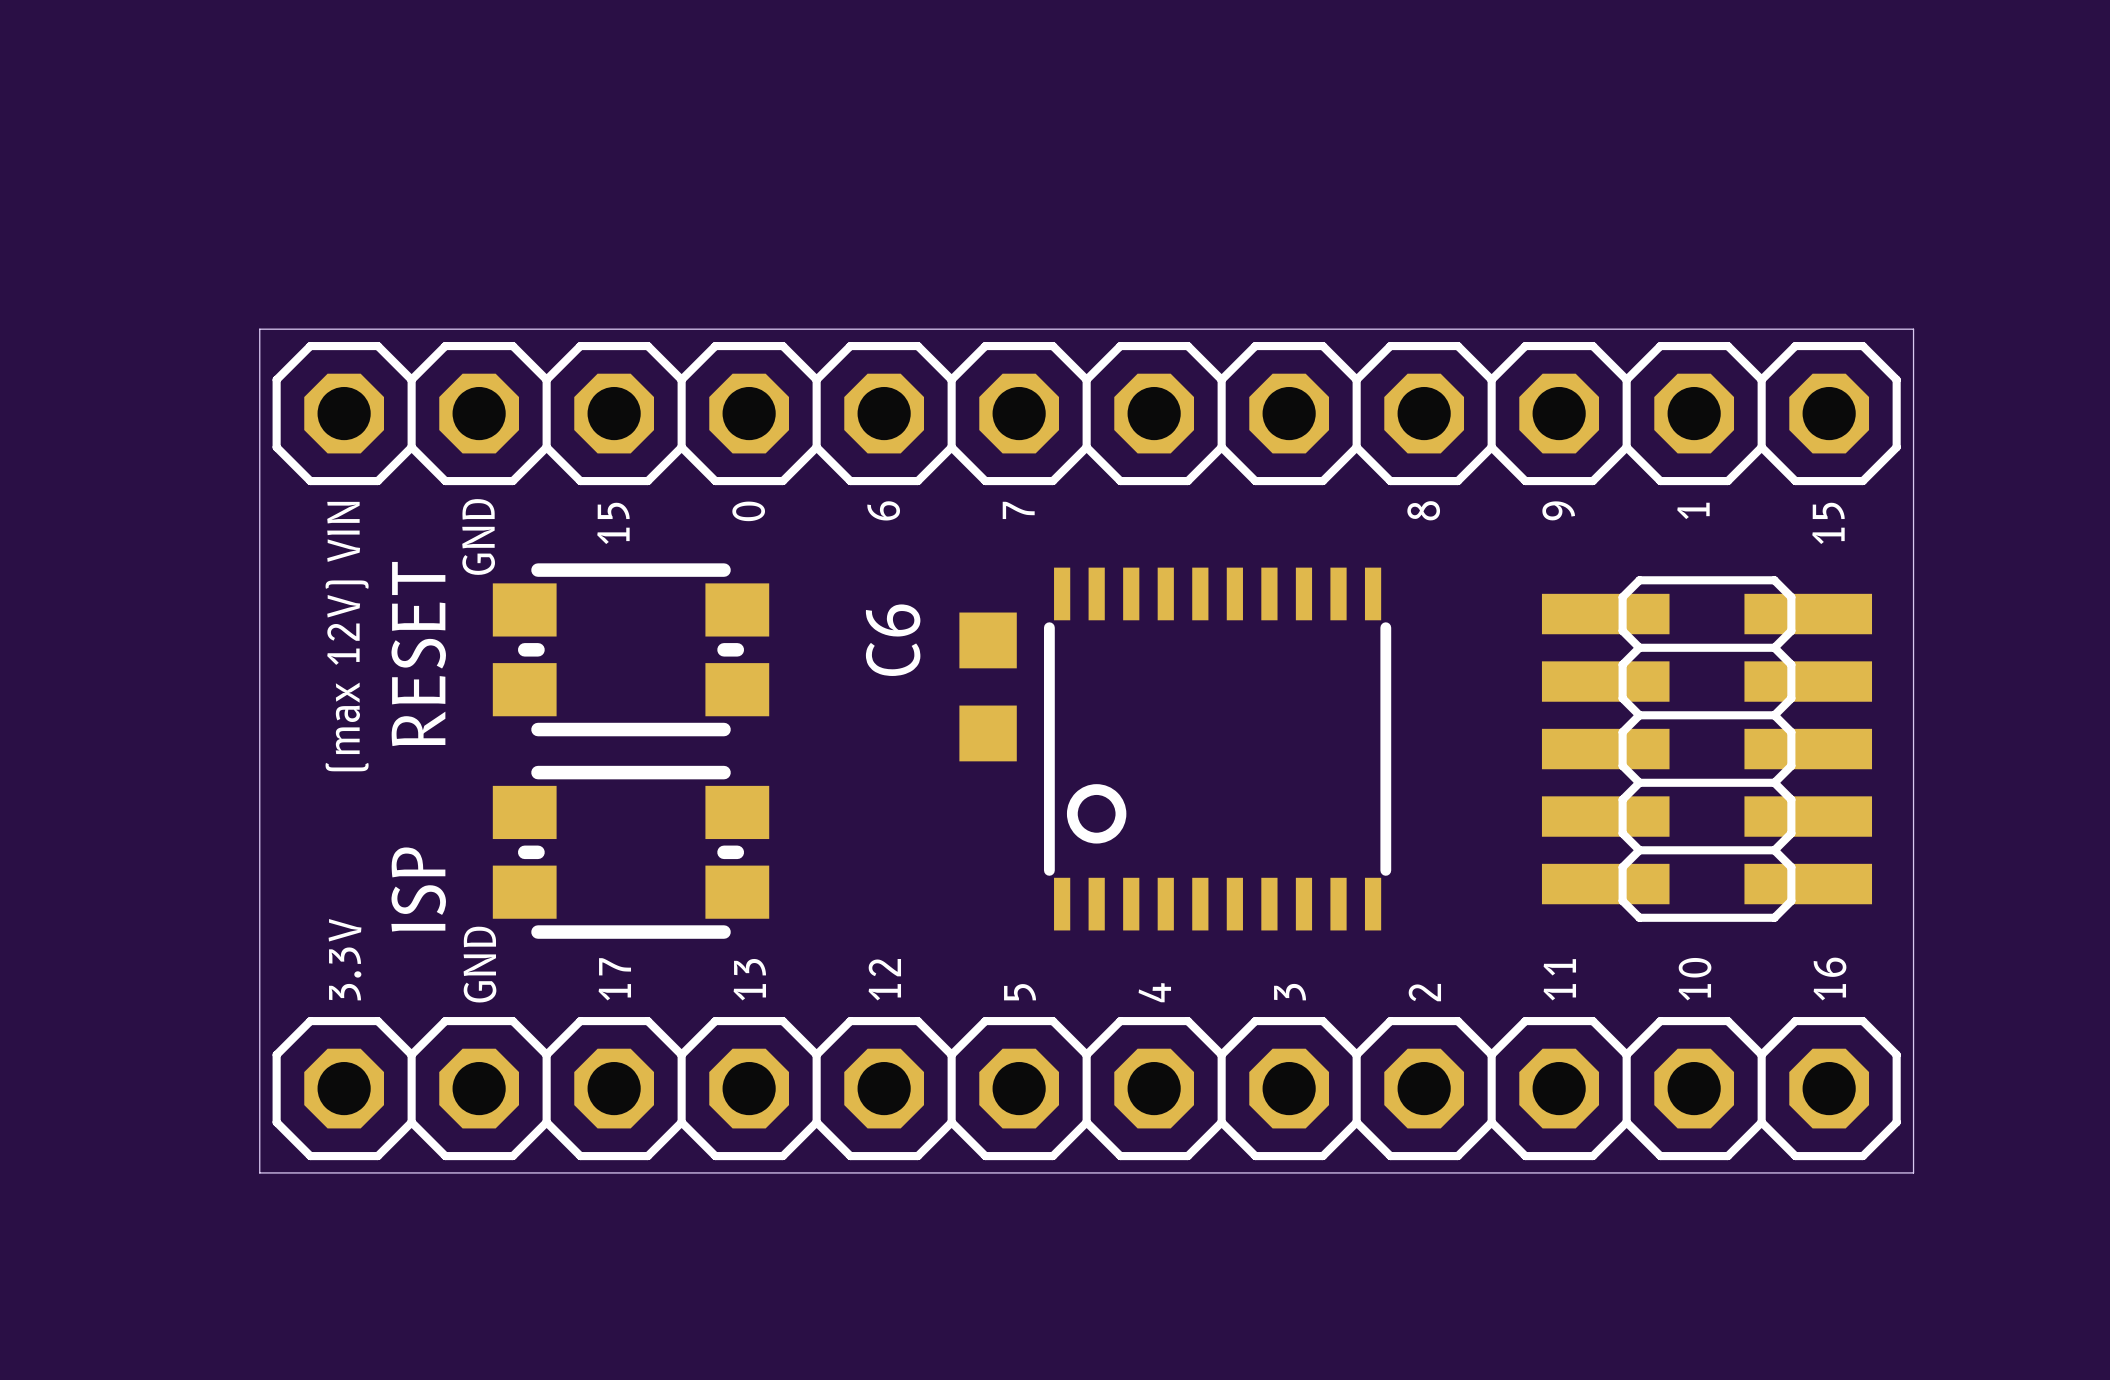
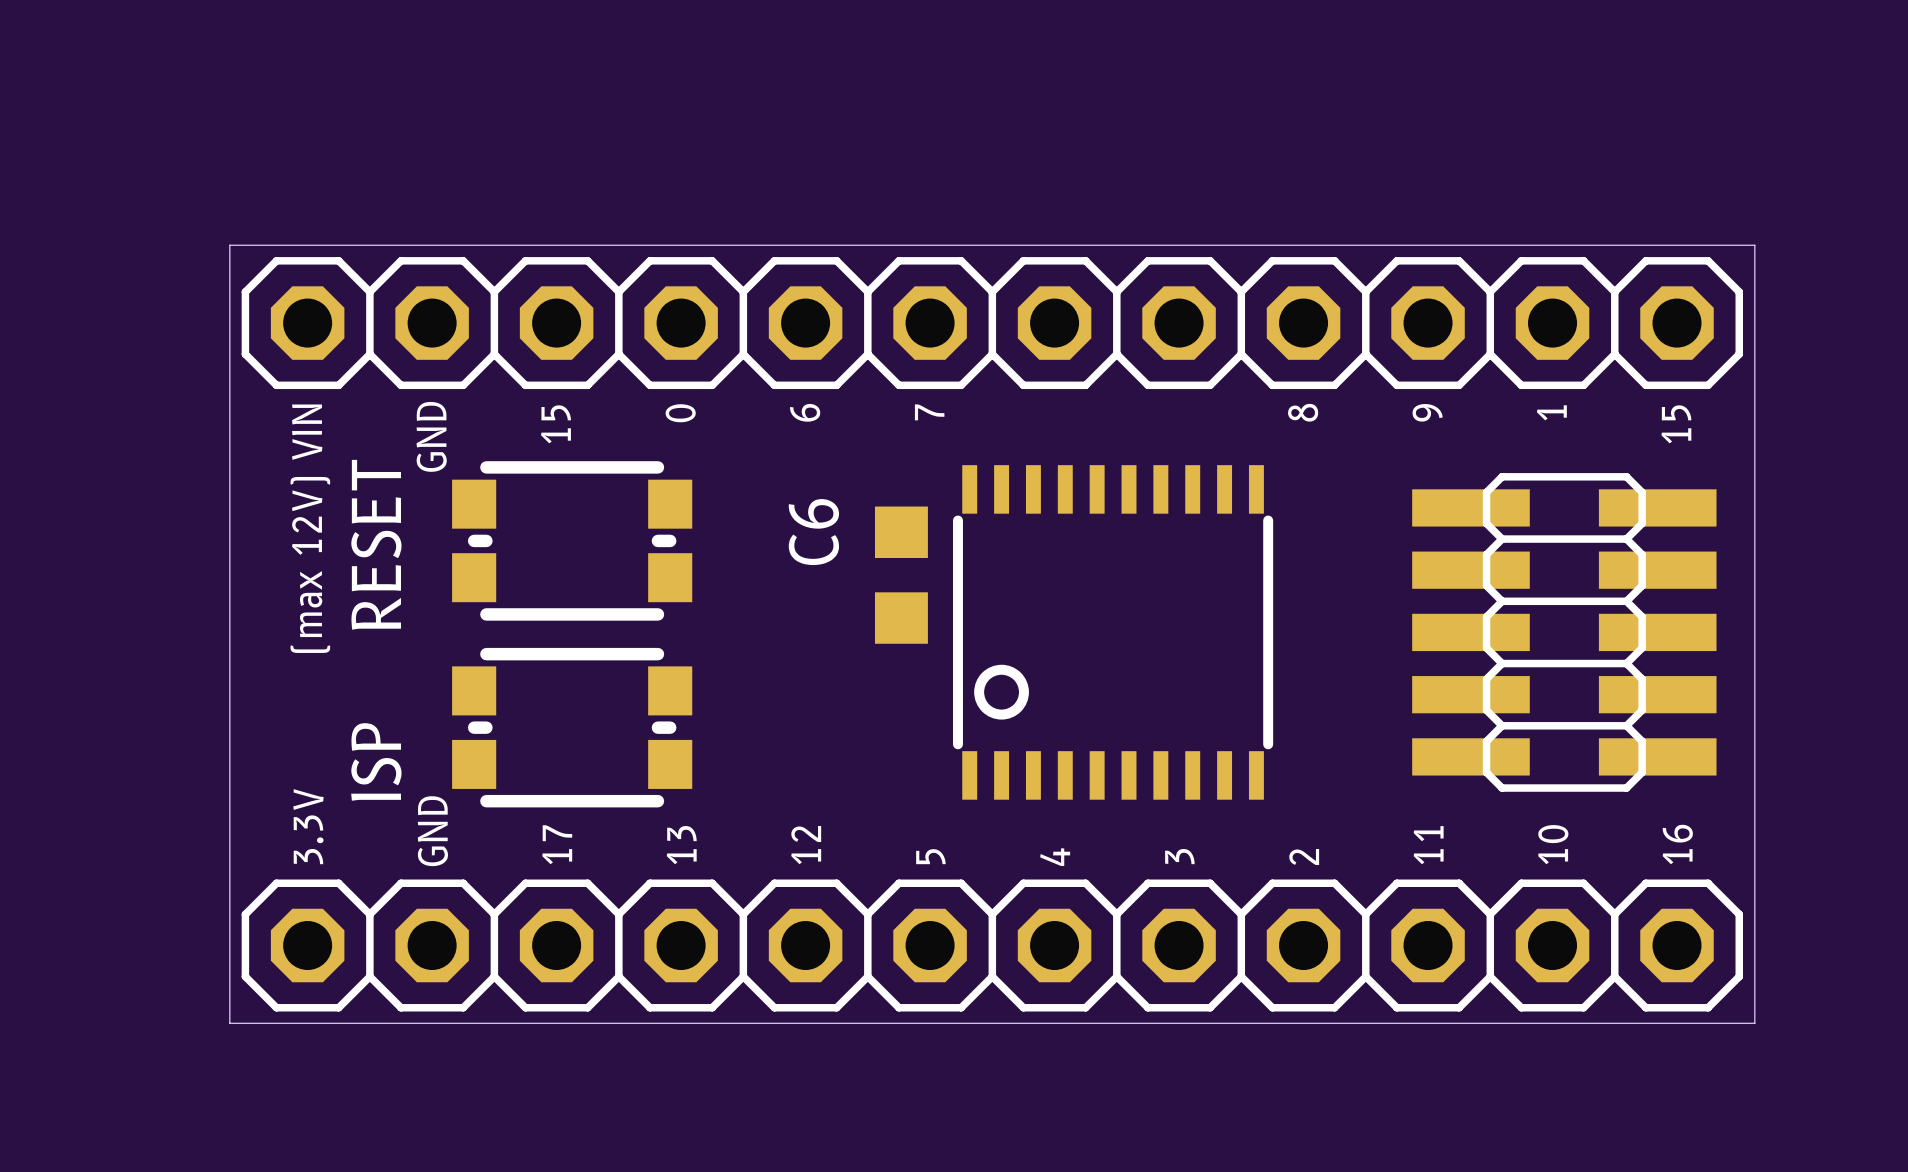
part footprint: [492, 563, 770, 737] -> [452, 461, 693, 621]
part footprint: [492, 765, 770, 939] -> [452, 647, 693, 808]

